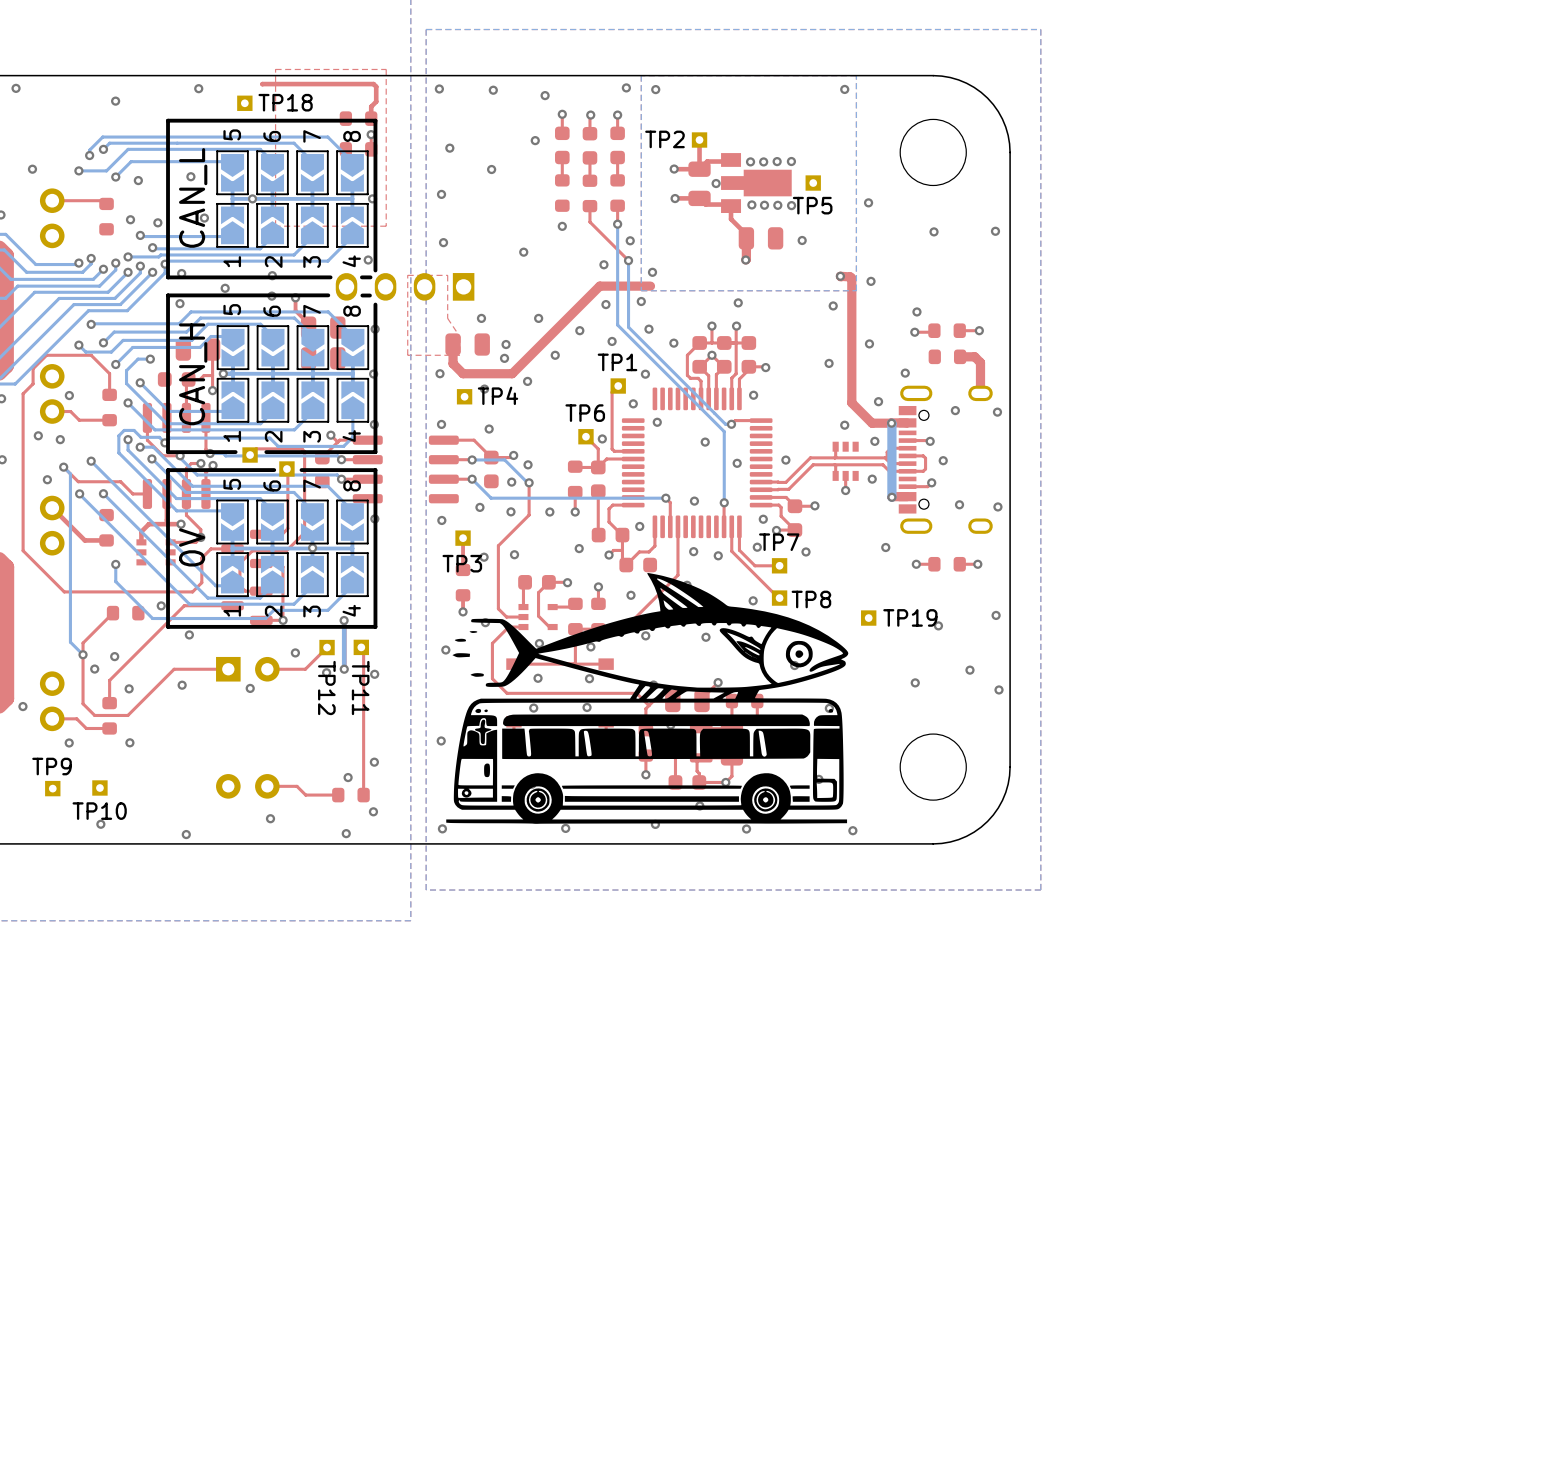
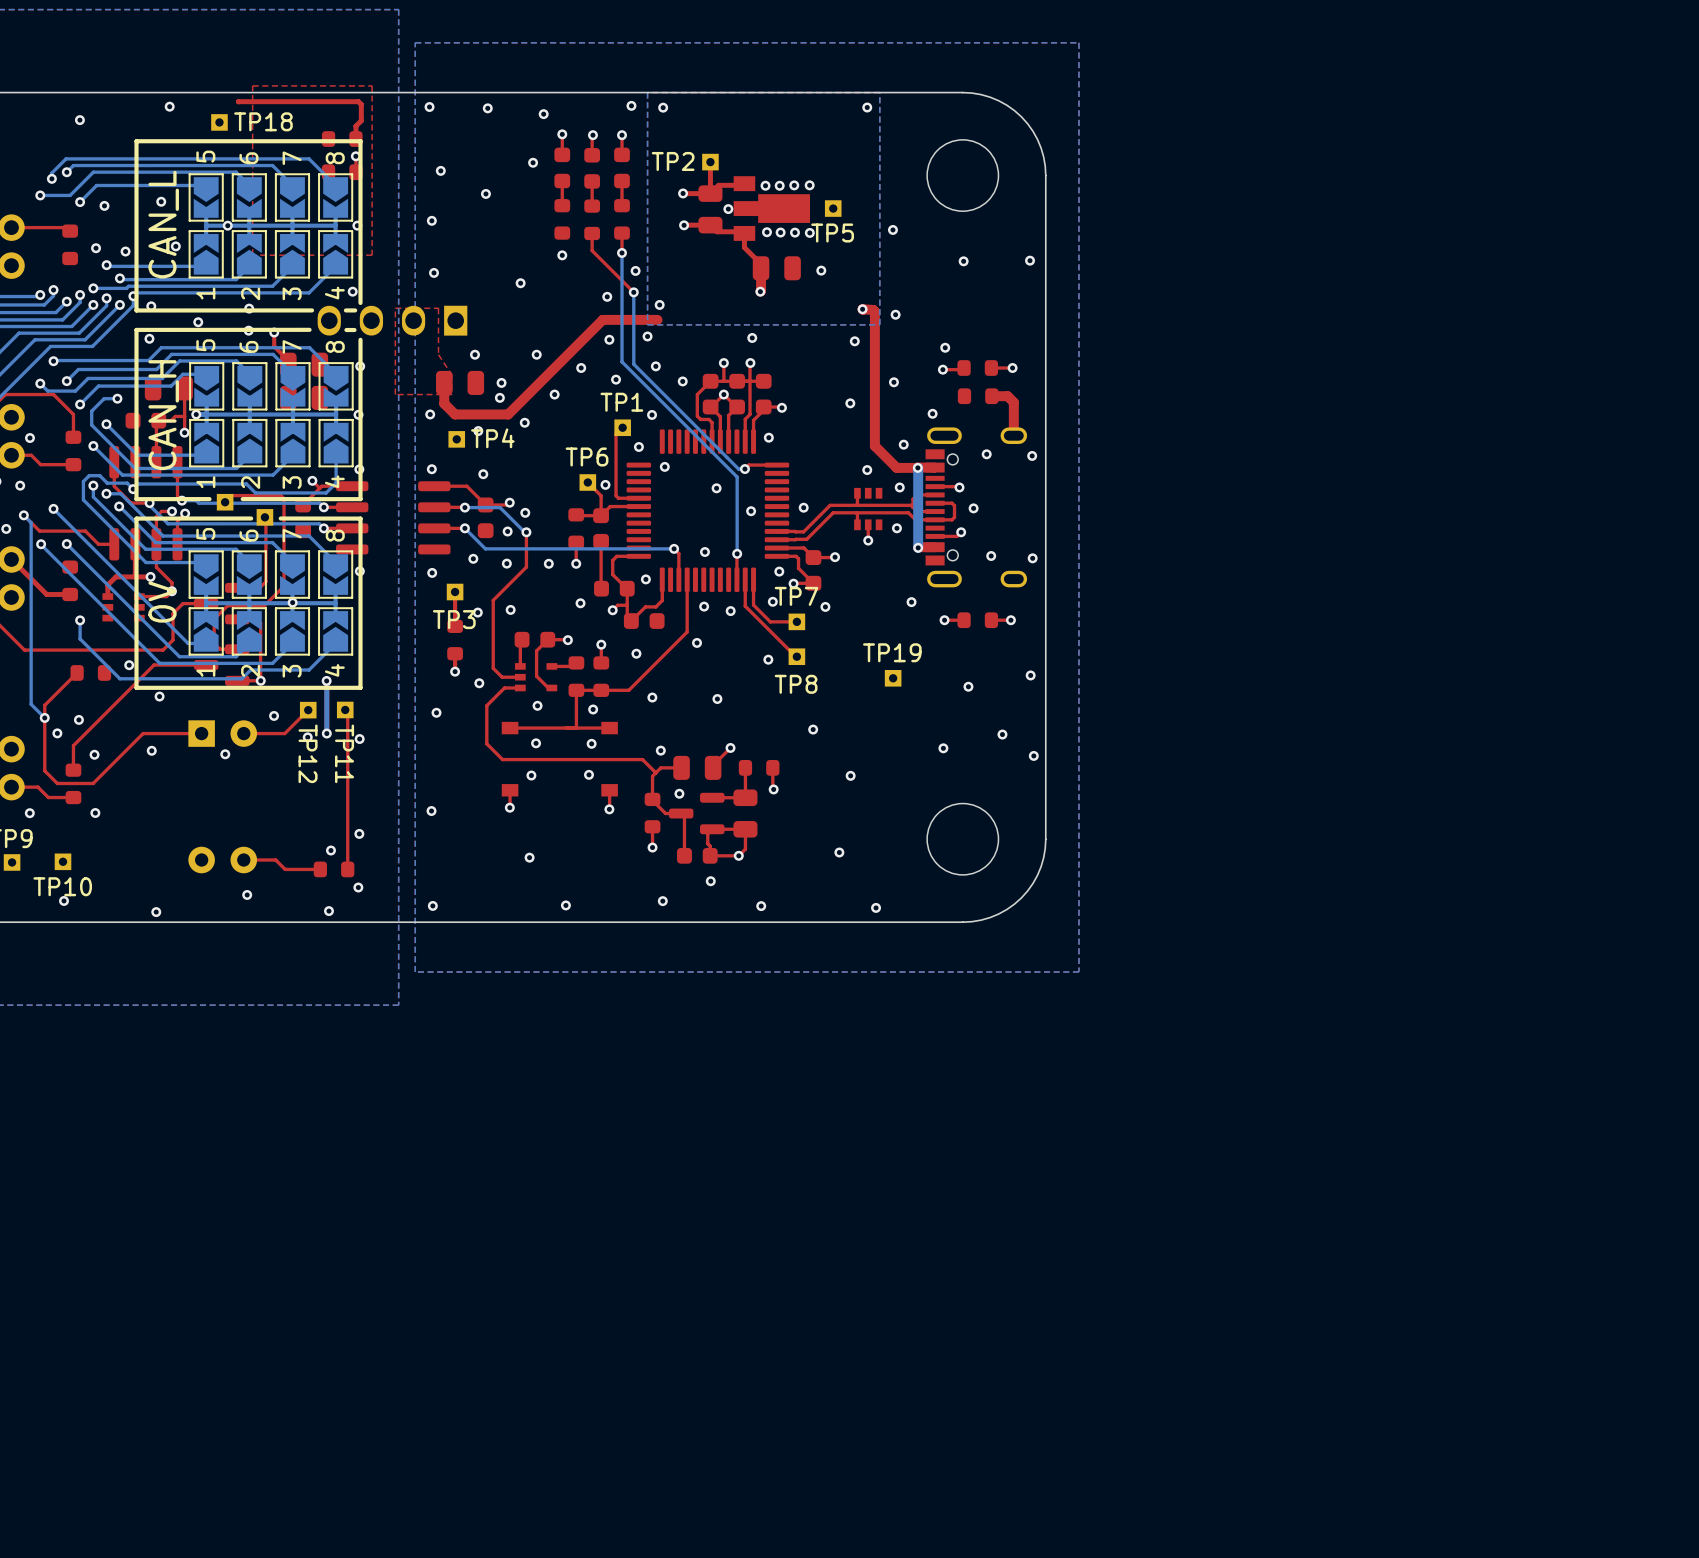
drawing: [446, 572, 849, 824] -> none
TP8 name position: TP8 (811, 599) -> TP8 (796, 684)
TP19 name position: TP19 (910, 617) -> TP19 (892, 652)

